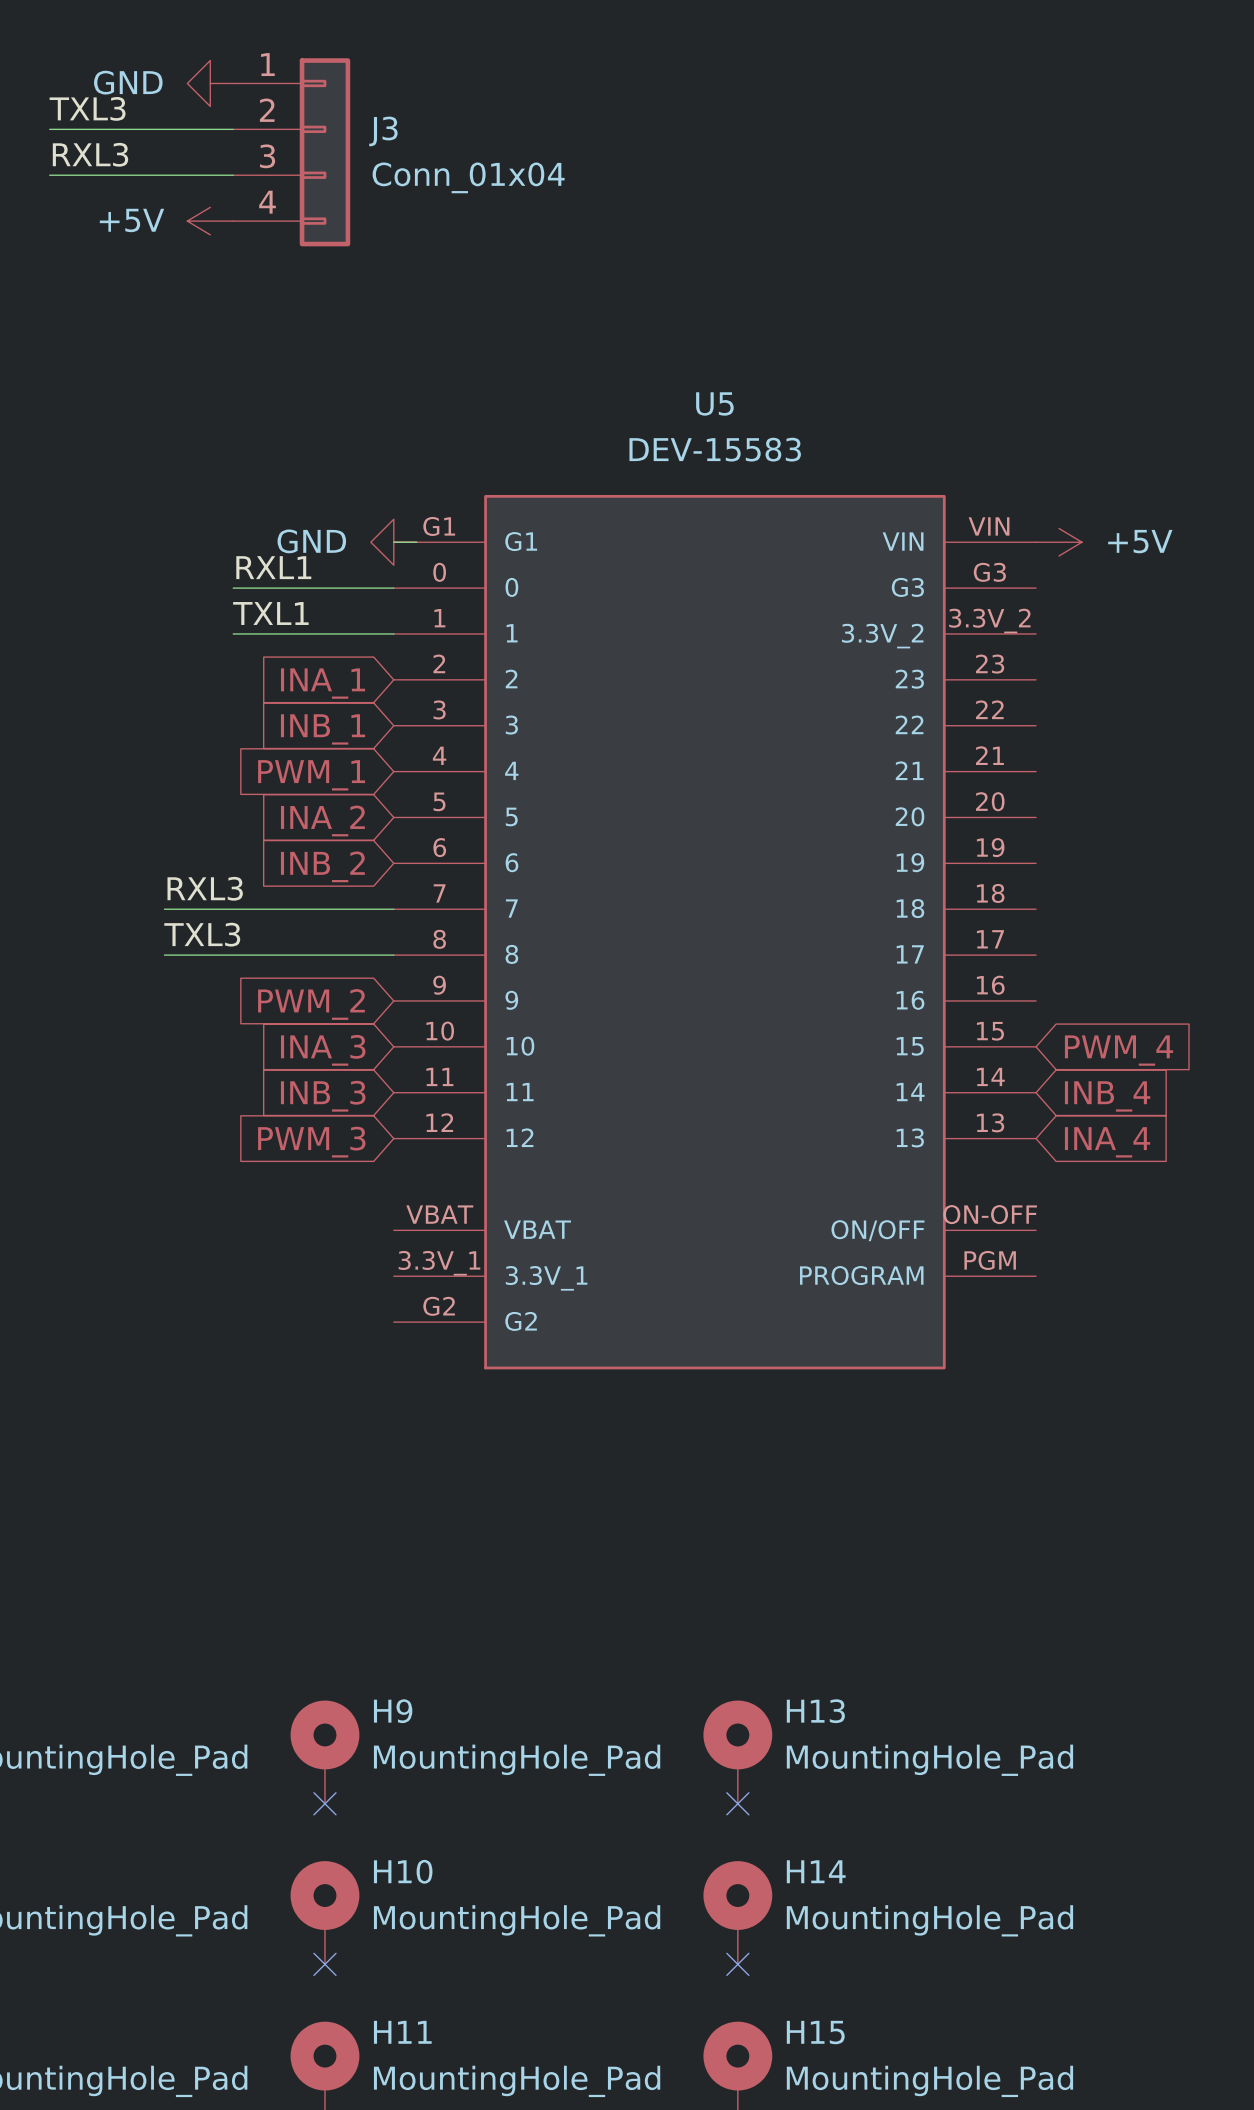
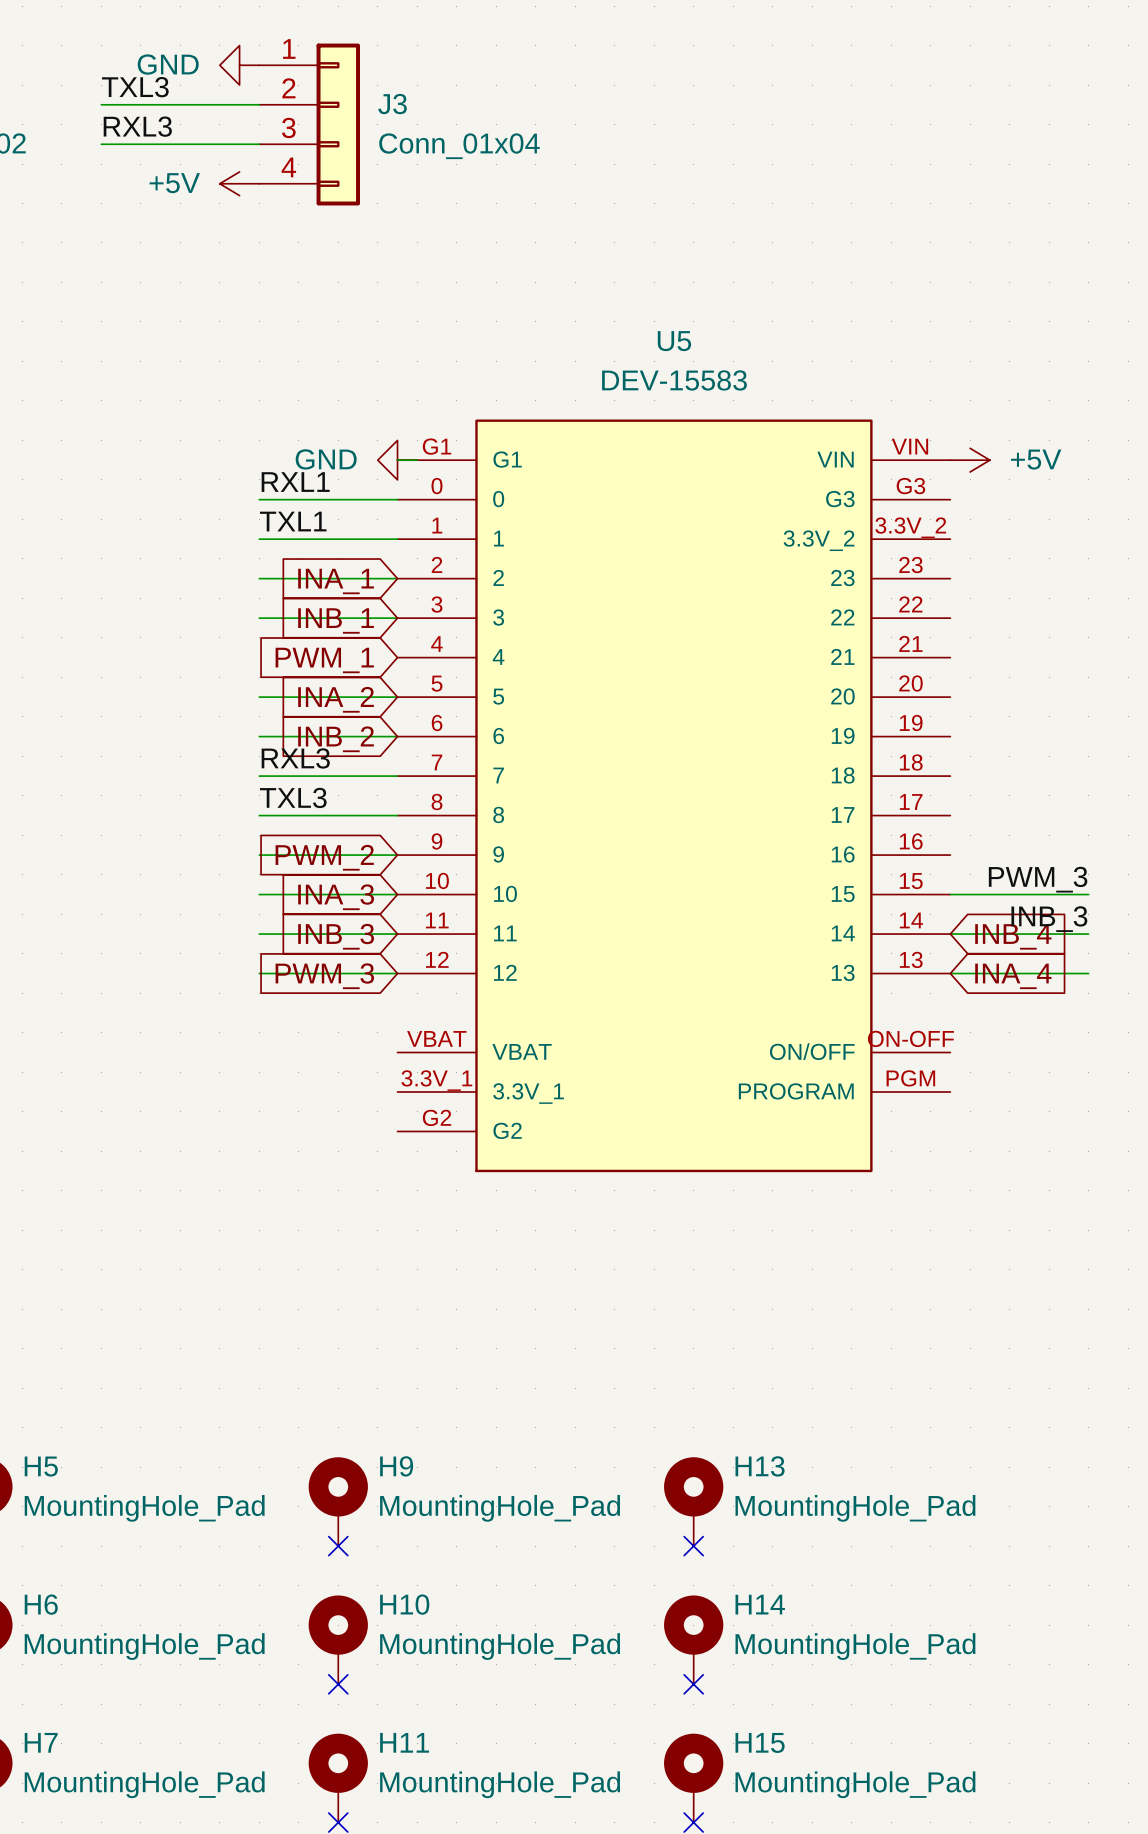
wire: none -> (259, 578) (397, 578)
wire: none -> (259, 618) (397, 618)
wire: none -> (259, 697) (397, 697)
wire: none -> (259, 736) (397, 736)
label position: RXL3 (205, 888) -> RXL3 (295, 758)
wire: (164, 909) (233, 909) -> none
label position: TXL3 (202, 934) -> TXL3 (293, 797)
wire: (164, 955) (233, 955) -> none
wire: none -> (259, 855) (397, 855)
label: none -> PWM_3 (1038, 879)
wire: none -> (259, 894) (397, 894)
wire: none -> (950, 894) (1088, 894)
global label: PWM_4 (1118, 1050) -> none
label: none -> INB_3 (1049, 919)
wire: none -> (259, 934) (397, 934)
wire: none -> (950, 934) (1088, 934)
wire: none -> (259, 973) (397, 973)
wire: none -> (950, 973) (1088, 973)

